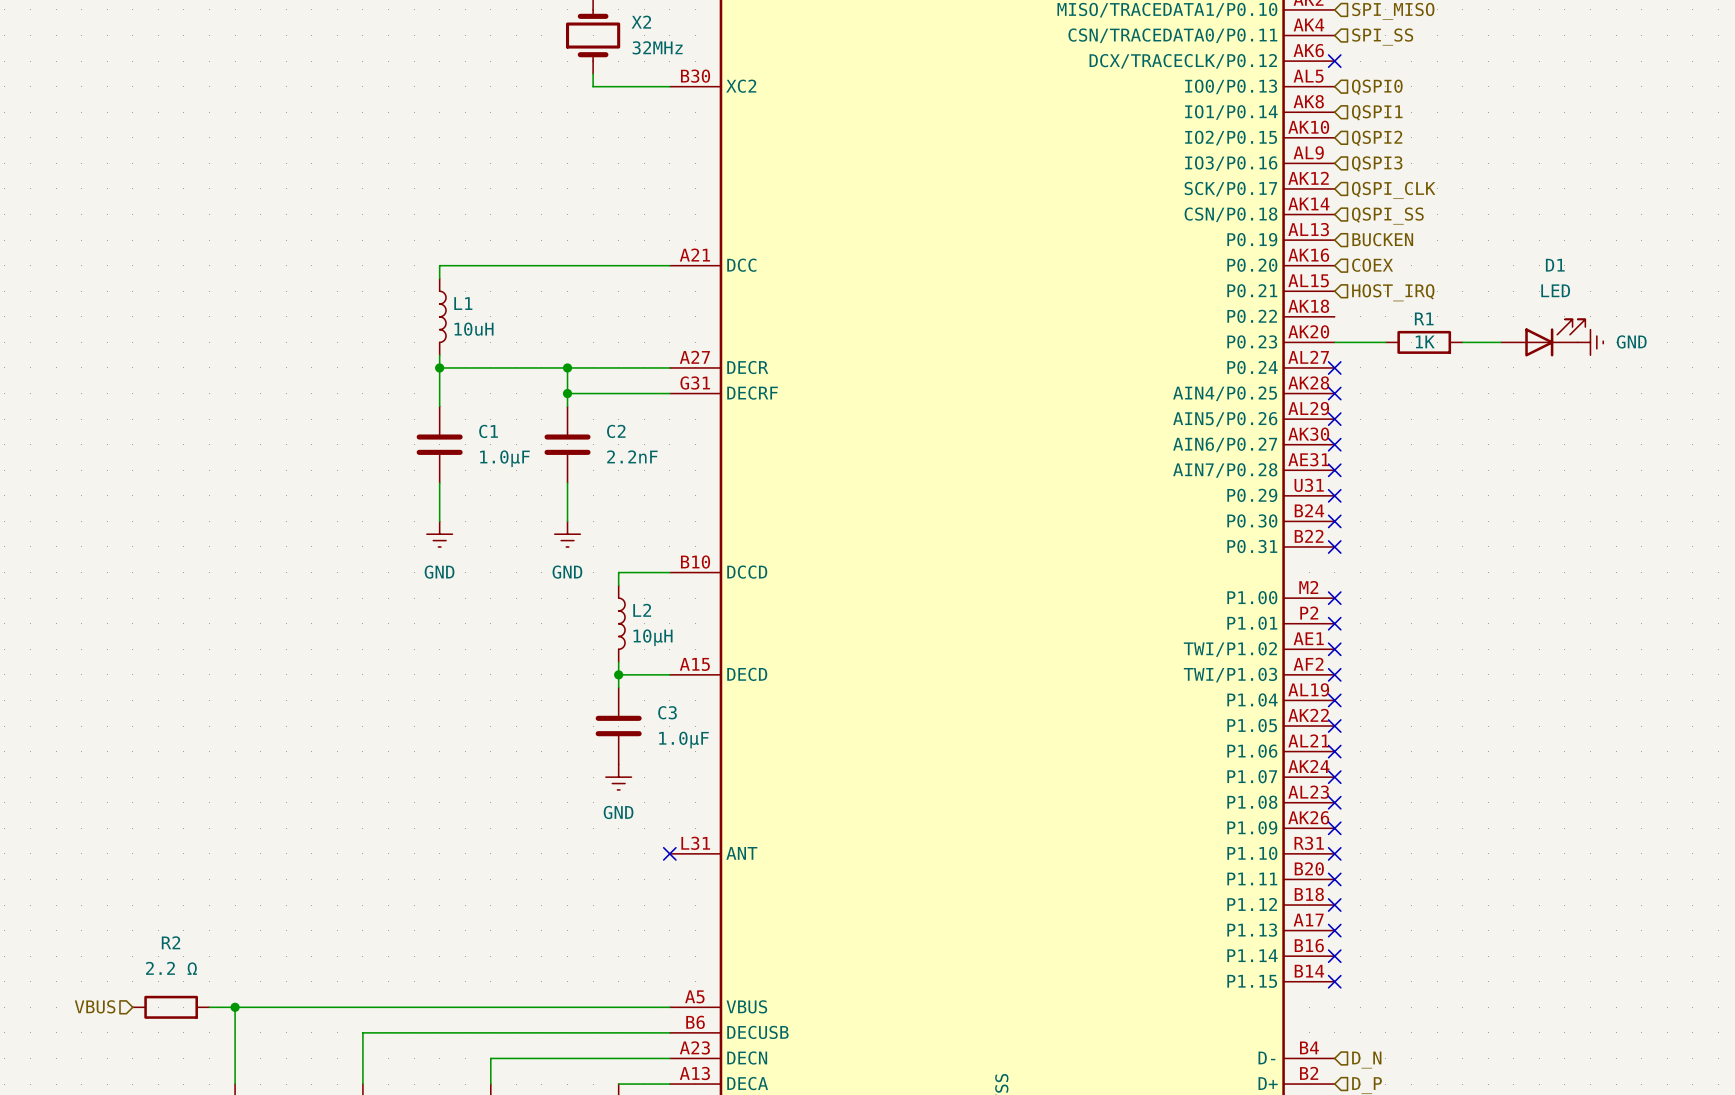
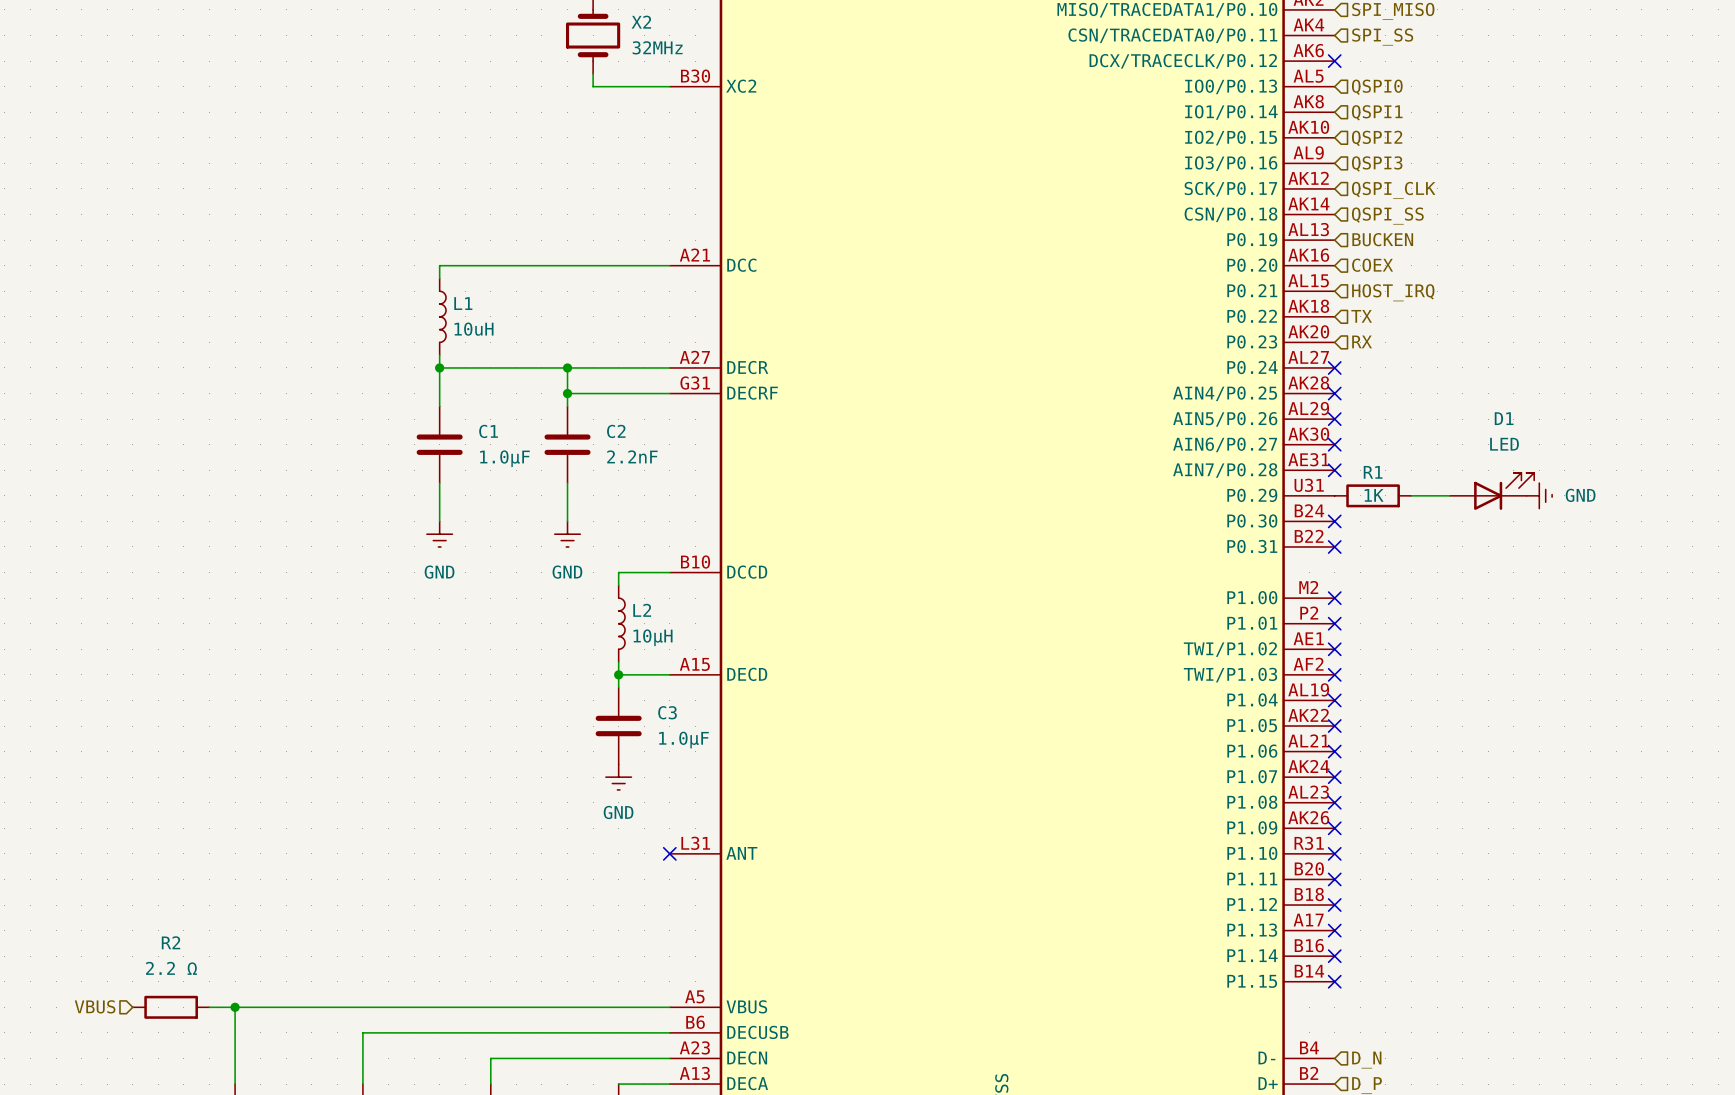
hierarchical label: none -> TX (1361, 316)
D1 position: (1543, 337) -> (1491, 491)
hierarchical label: none -> RX (1362, 341)
wire: (1334, 342) (1385, 342) -> none
R1 position: (1424, 342) -> (1373, 495)
wire: (1462, 342) (1500, 342) -> (1411, 495) (1449, 495)
power symbol position: GND (1590, 342) -> GND (1539, 495)
no-connect mark: (1334, 495) -> none

